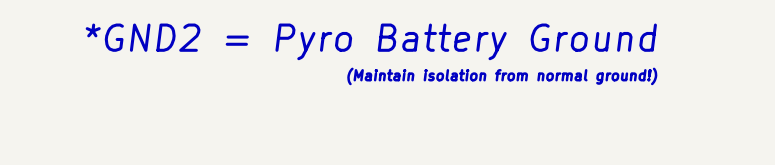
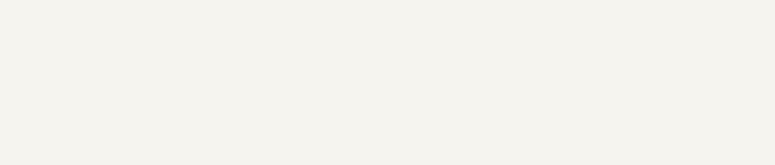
text: *GND2 = Pyro Battery Ground (371, 41) -> none
text: (Maintain isolation from normal ground!) (502, 76) -> none

